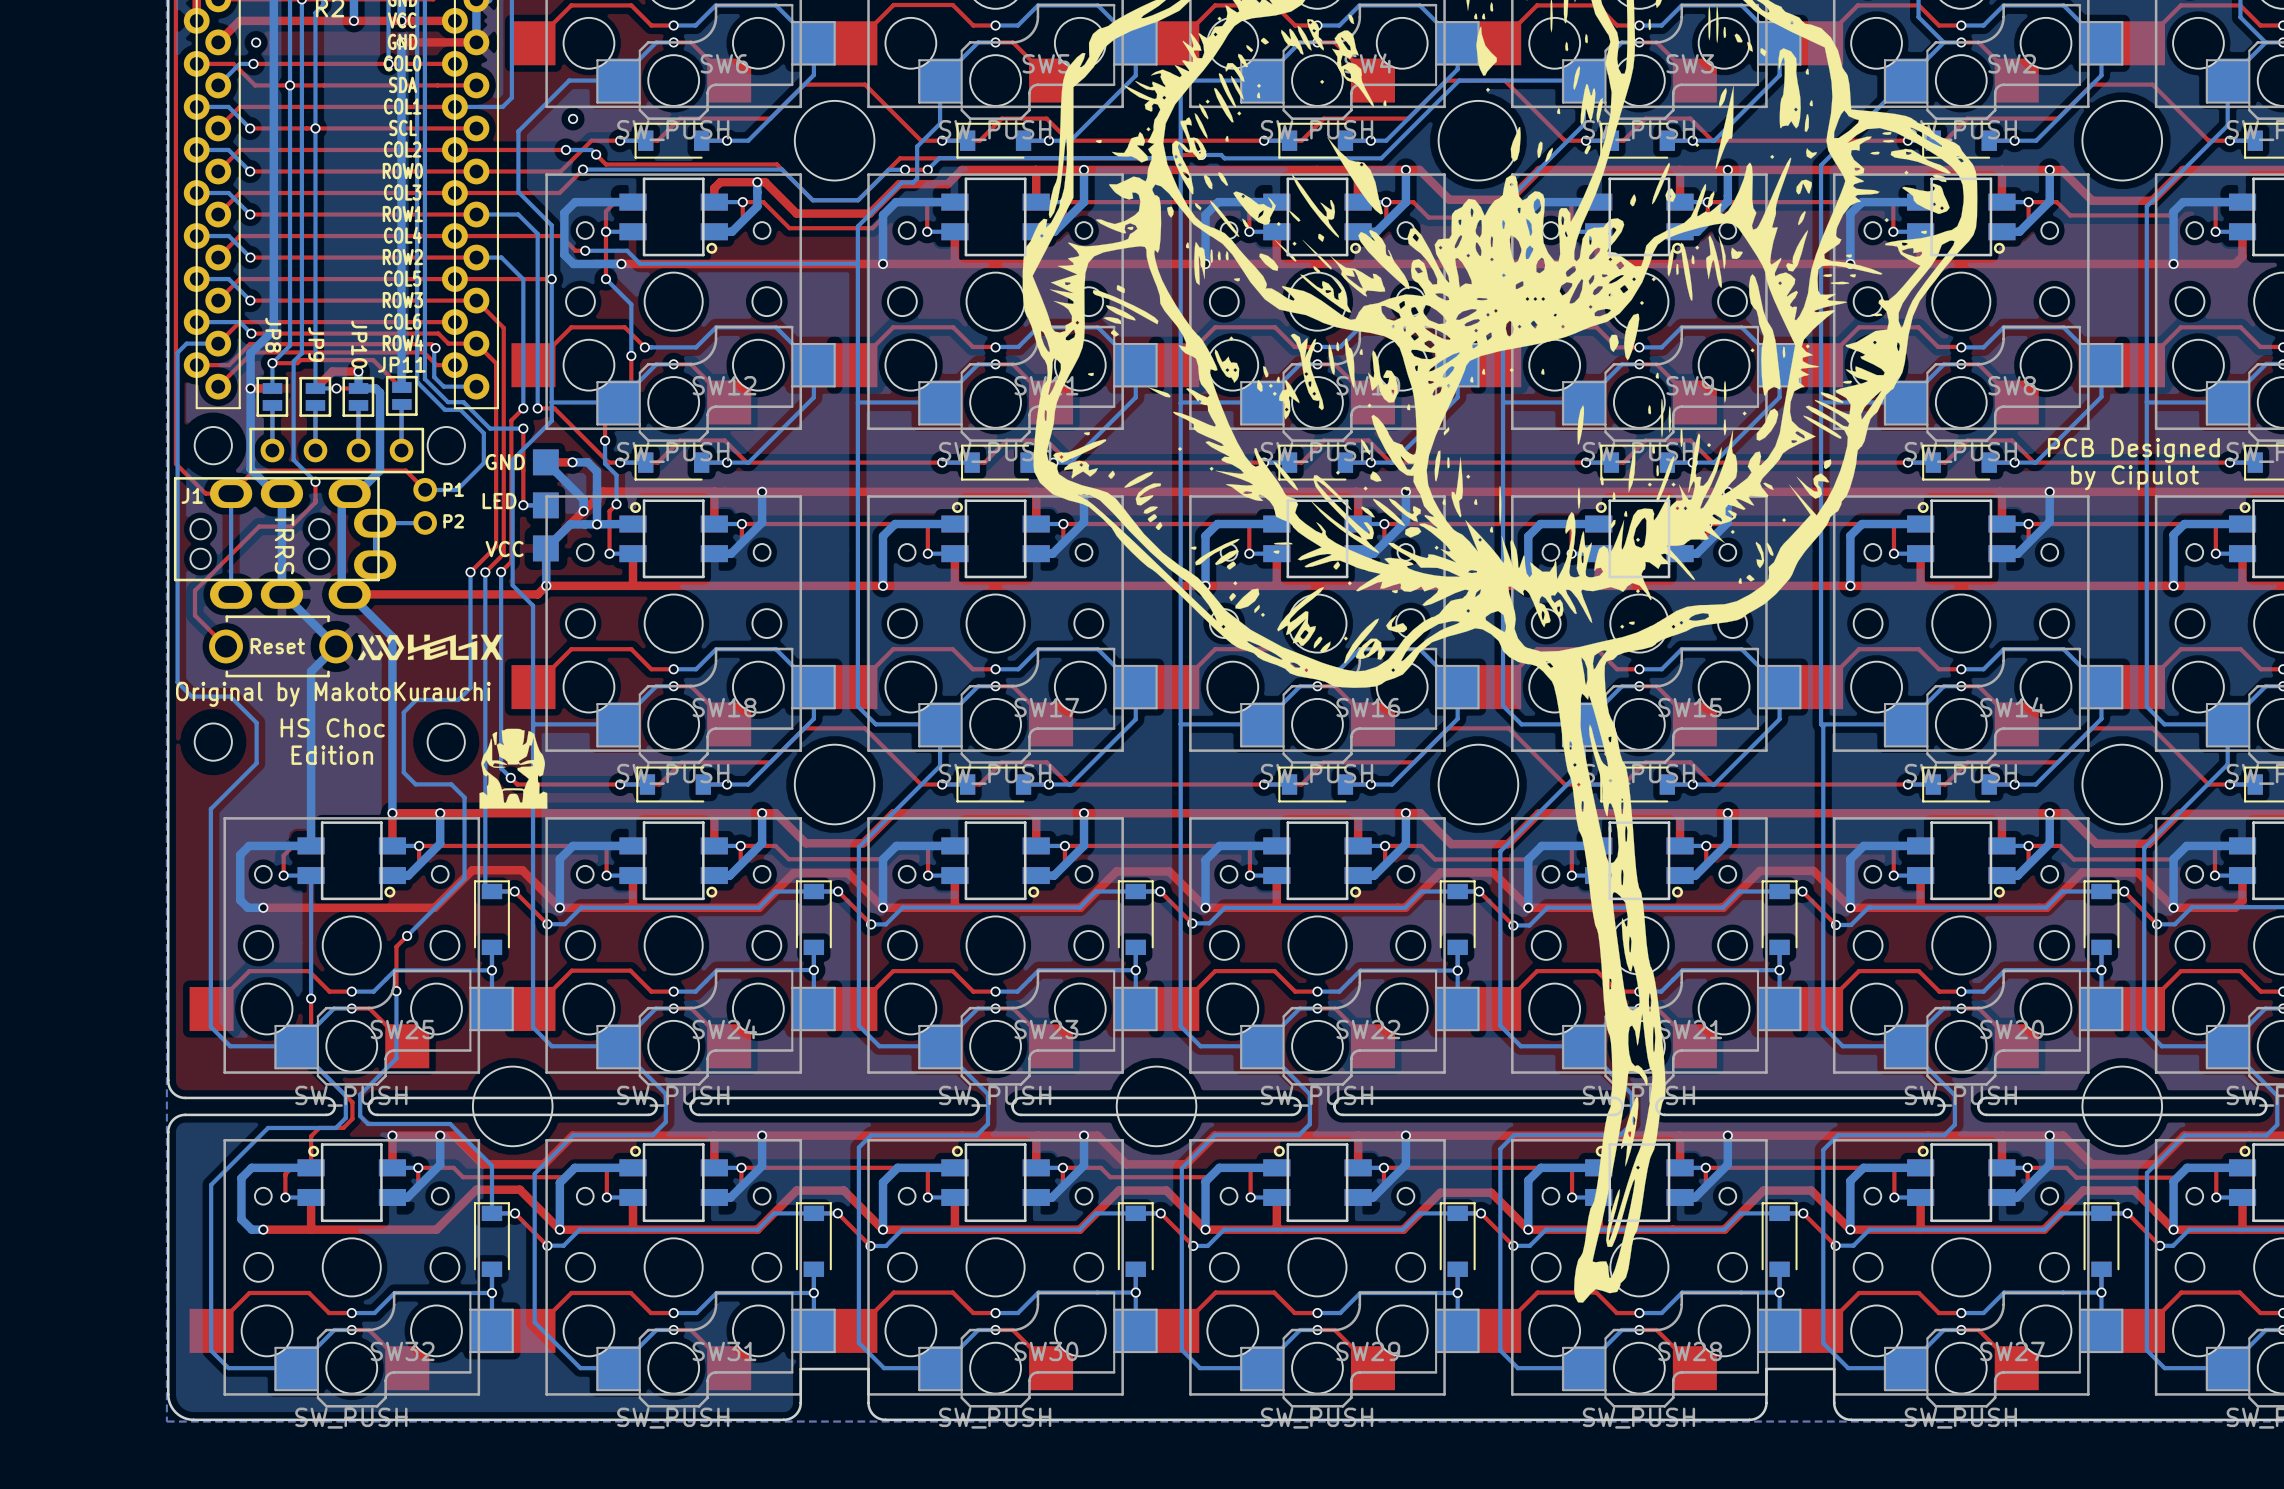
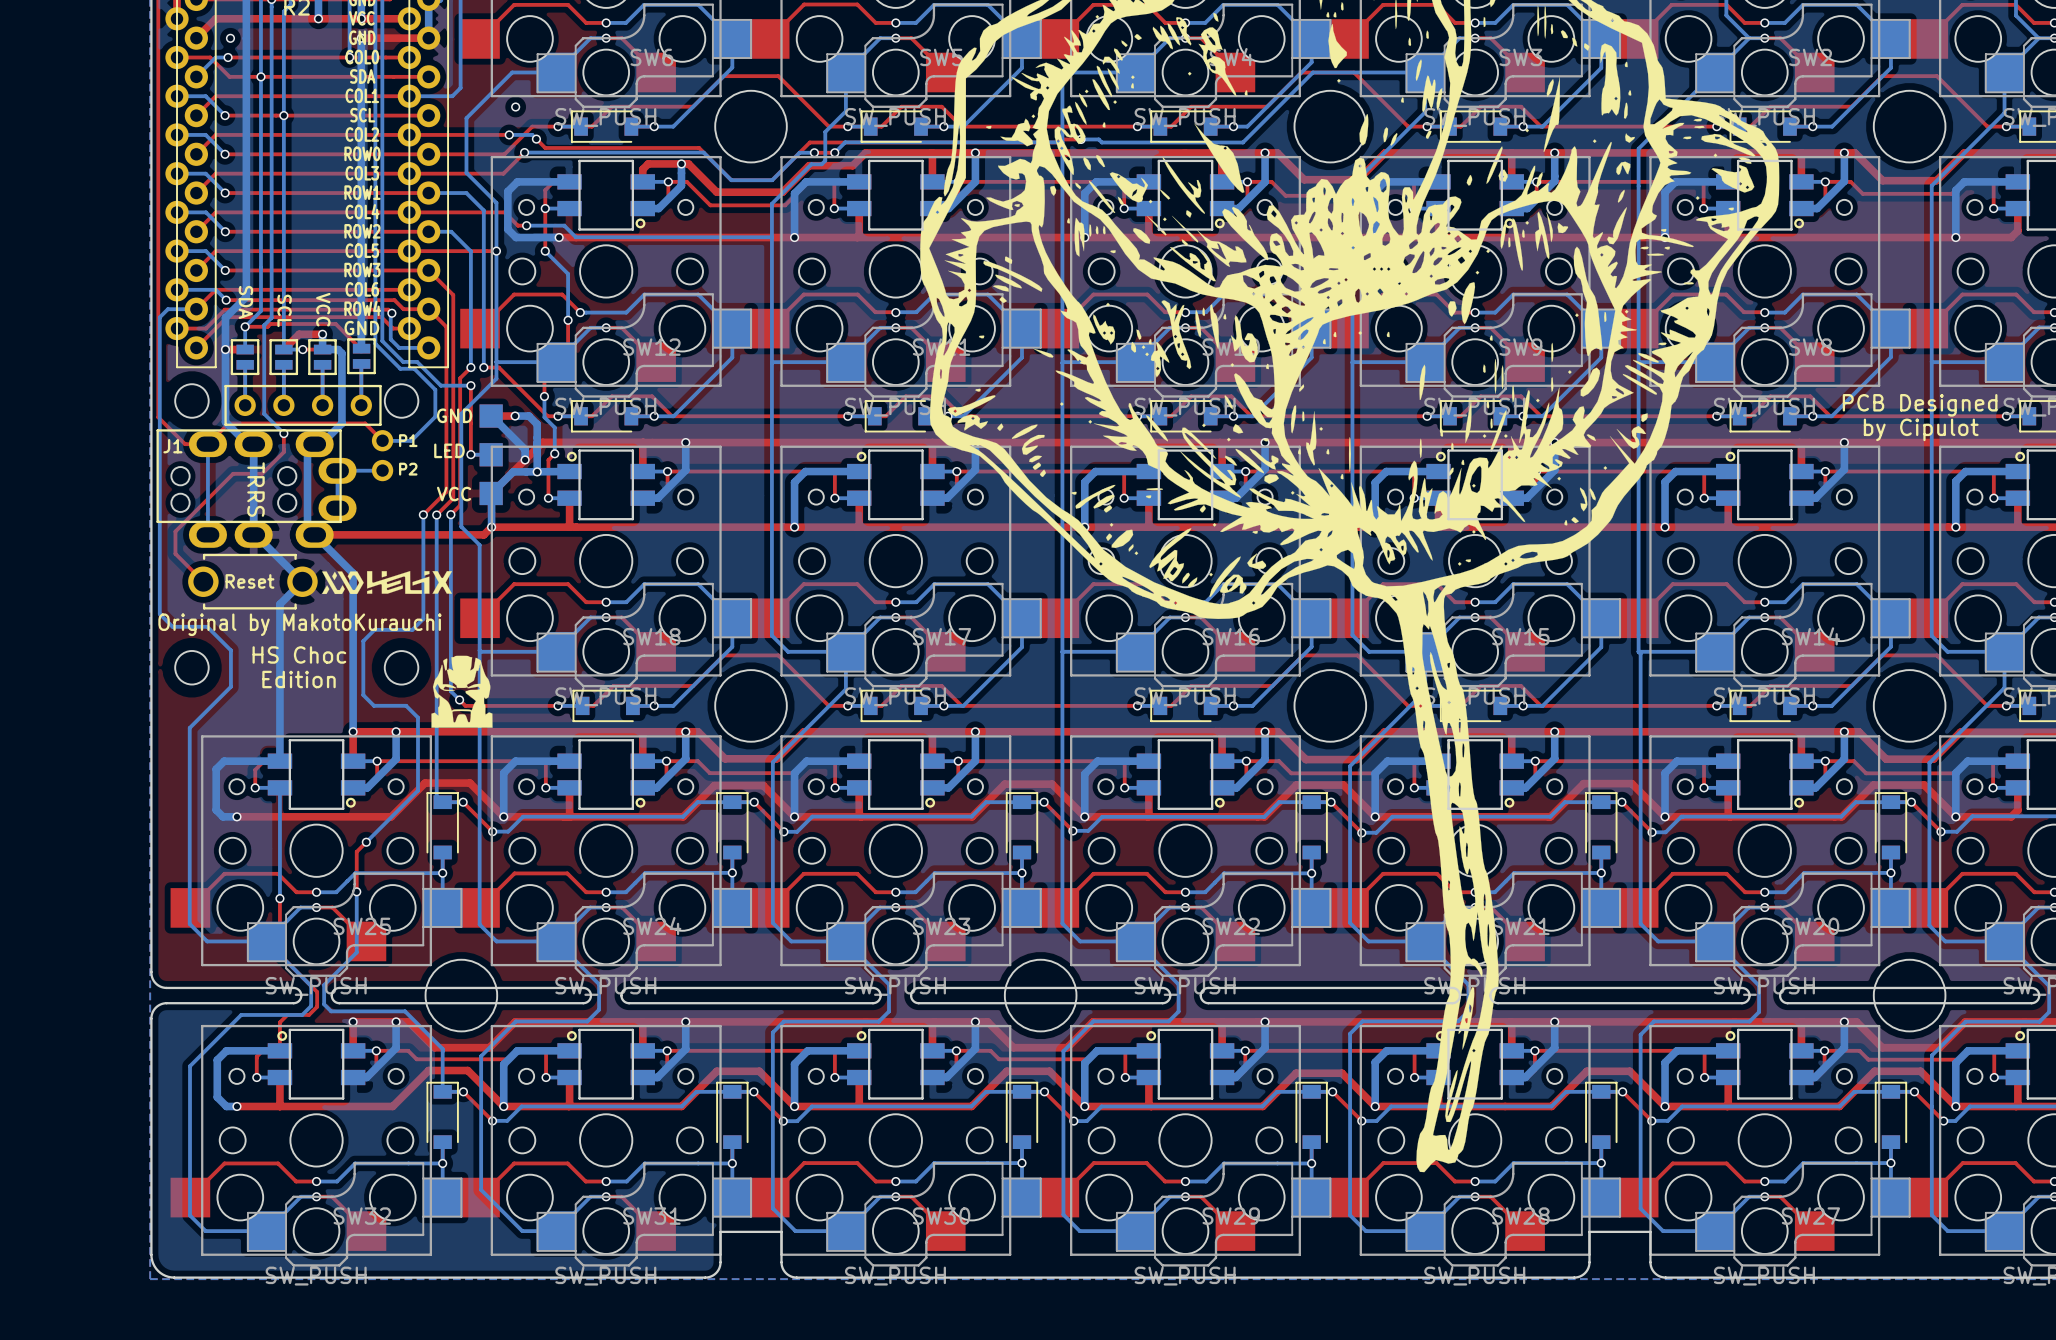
JP8 name: JP8 (273, 335) -> SDA (245, 302)
JP9 name: JP9 (316, 344) -> SCL (284, 310)
JP10 name: JP10 (359, 344) -> VCC (323, 309)
JP11 name: JP11 (401, 364) -> GND (361, 328)

